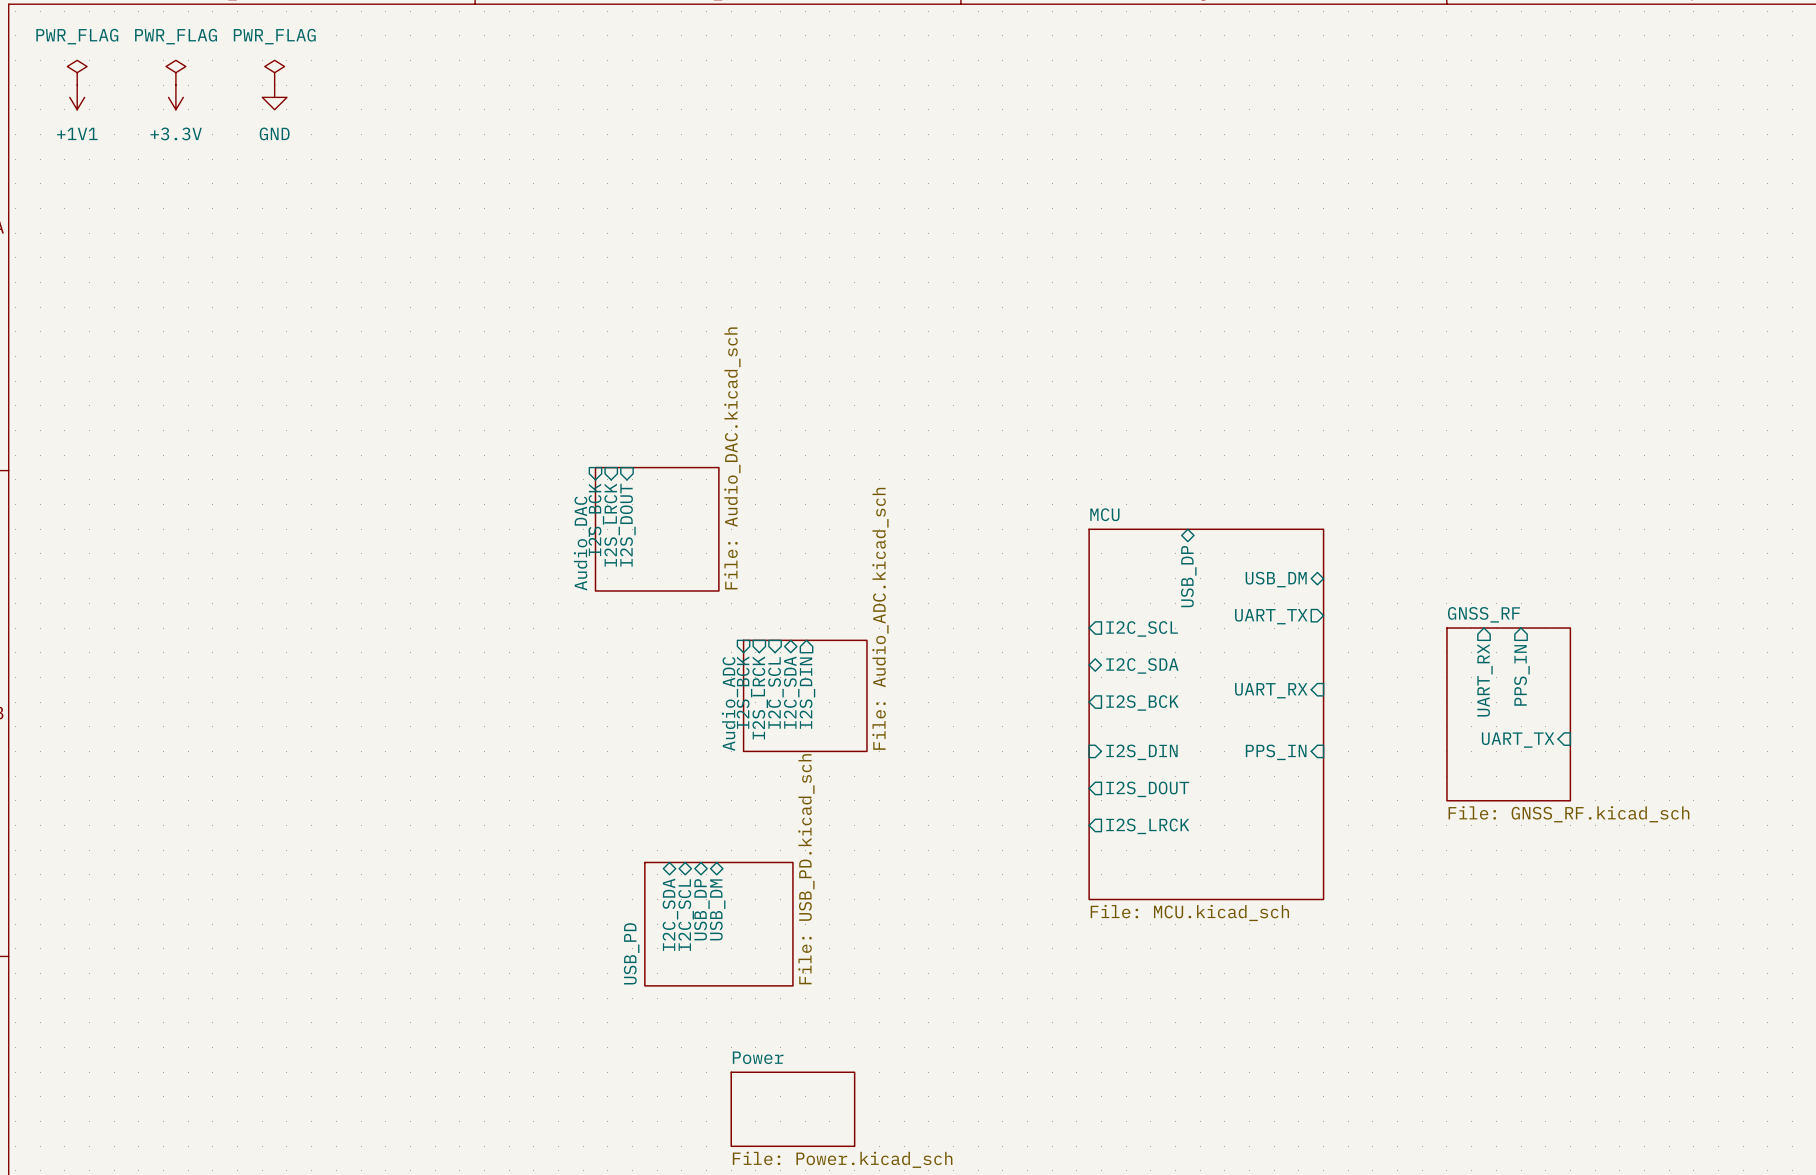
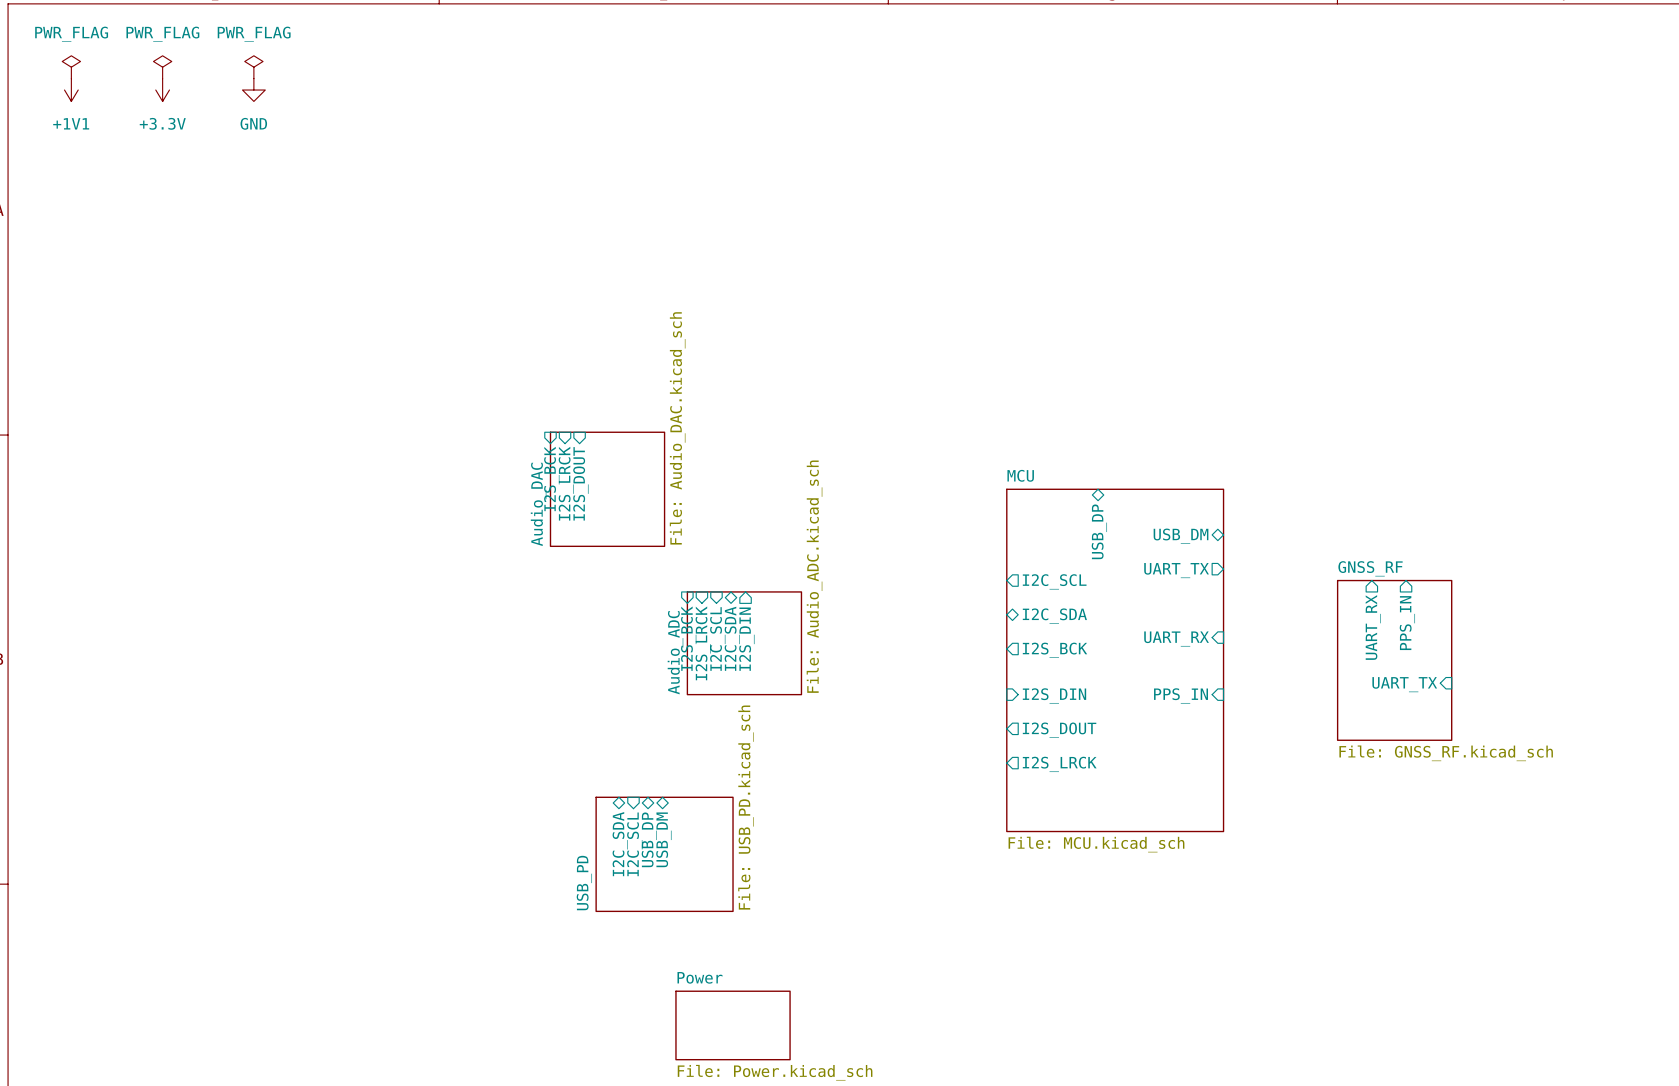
sheet pin shape: bidirectional (686, 915) -> input (634, 844)

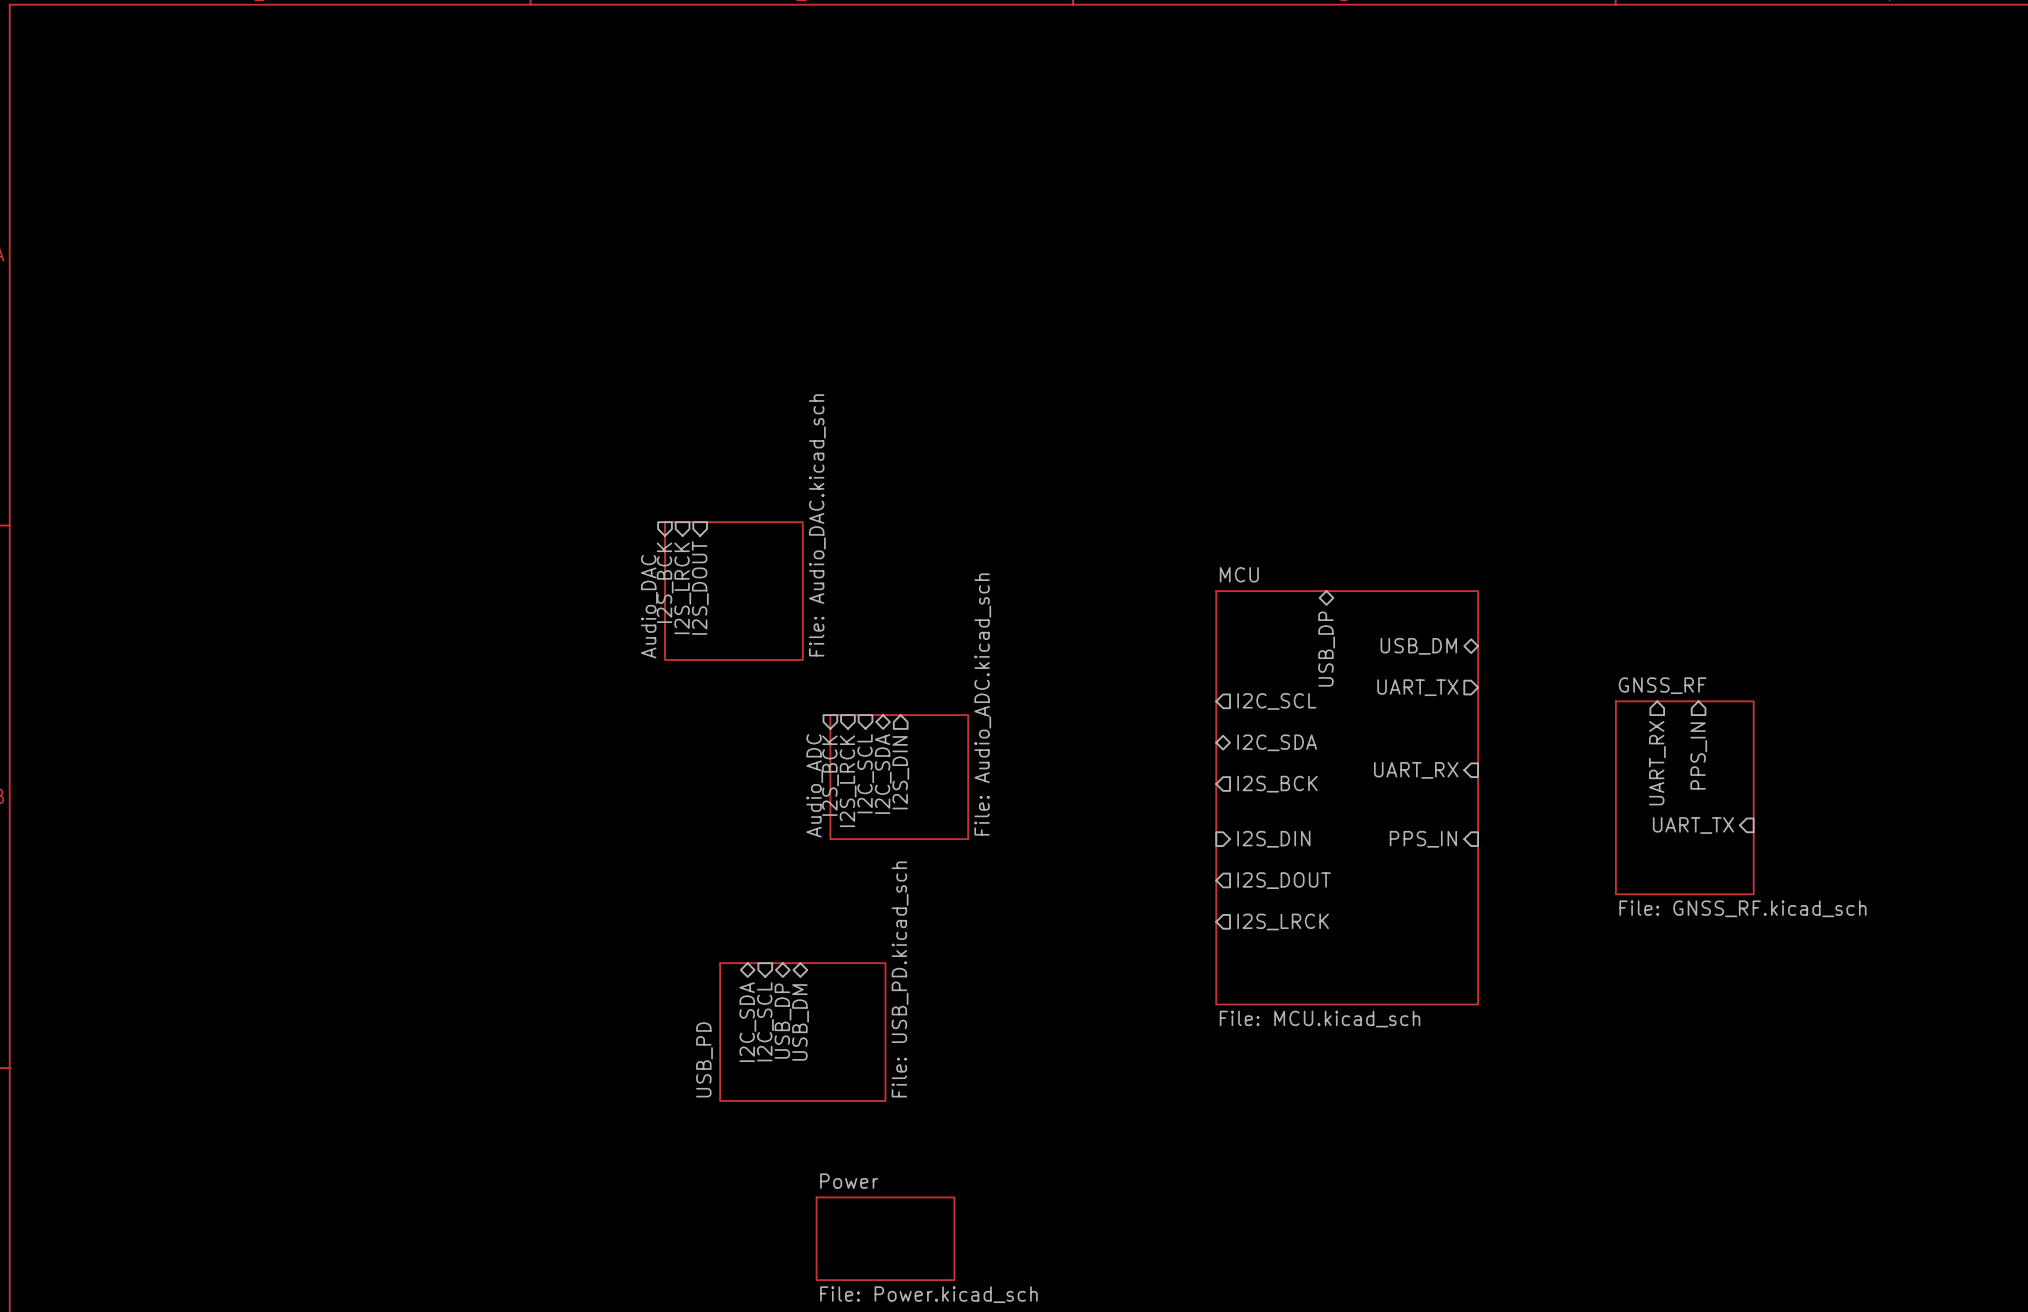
power symbol: PWR_FLAG (71, 67) -> none
power symbol: PWR_FLAG (162, 67) -> none
power symbol: PWR_FLAG (253, 67) -> none
power symbol: +1V1 (71, 90) -> none
power symbol: +3.3V (162, 90) -> none
power symbol: GND (253, 90) -> none

